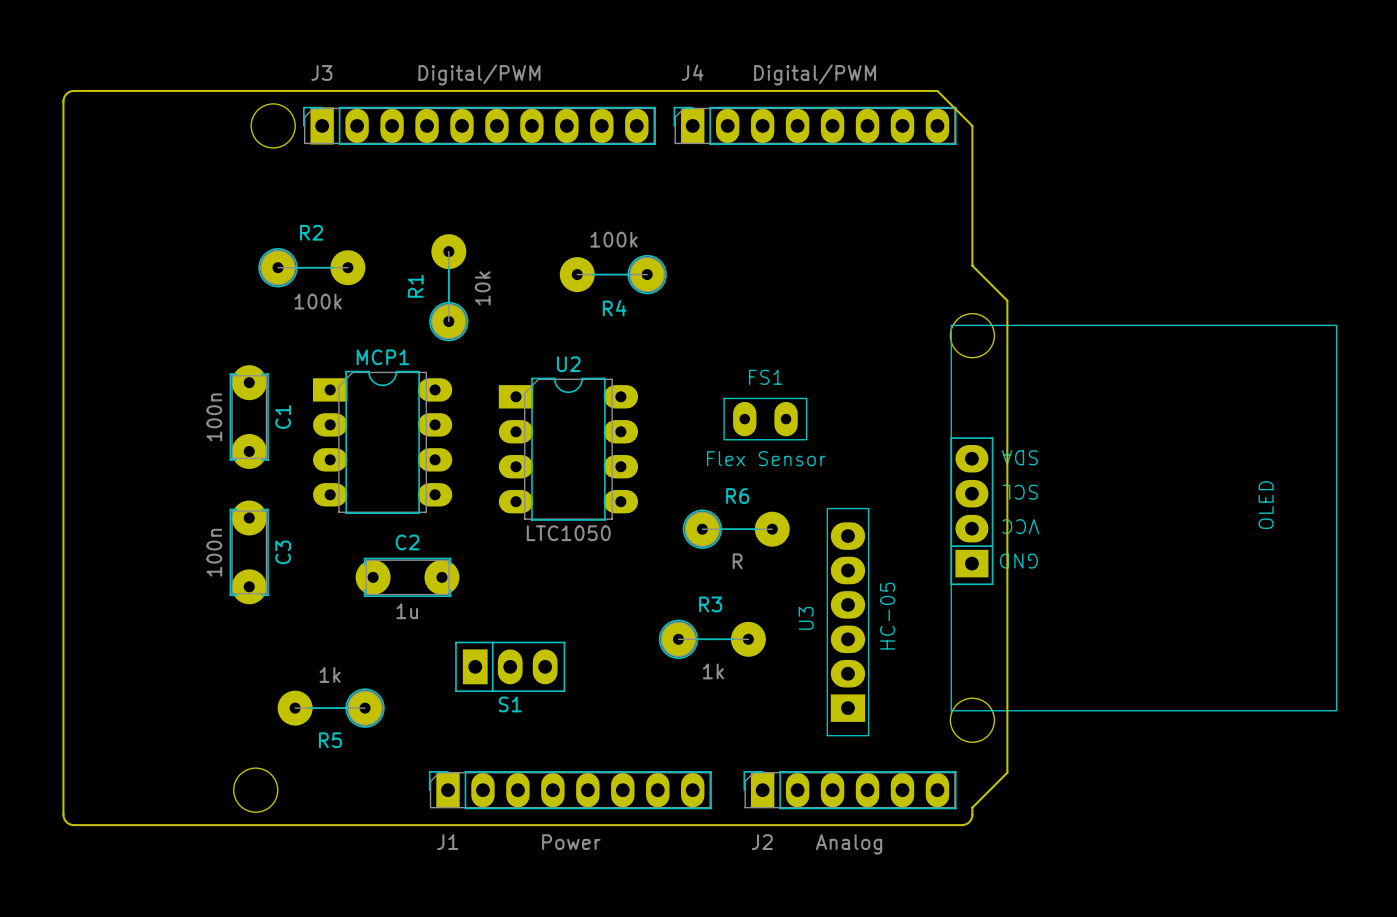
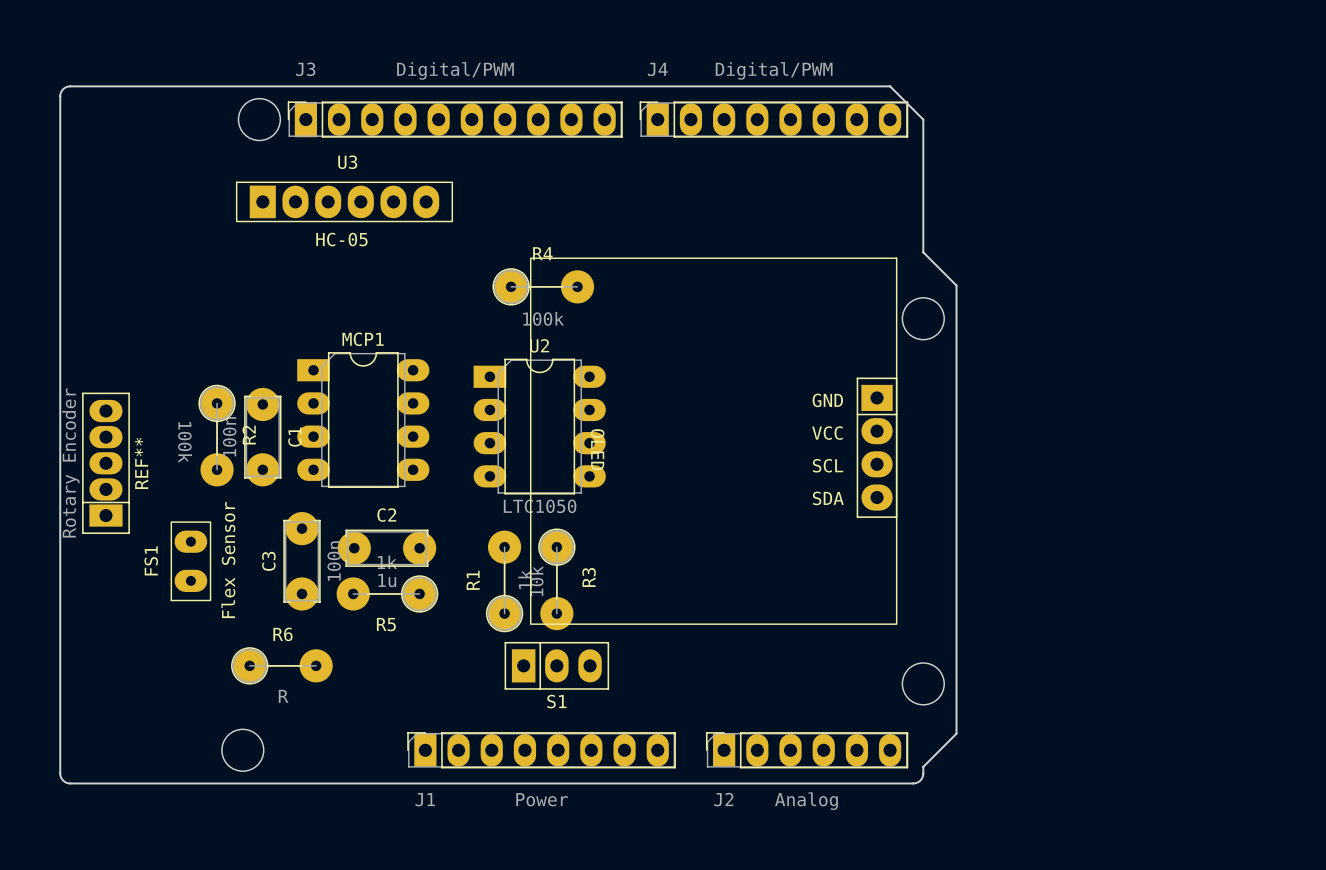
R2 rotation: 0° (311, 267) -> 90° clockwise (217, 435)
R2 position: (311, 267) -> (217, 435)
R4 rotation: 0° (613, 274) -> 180° (543, 286)
R1 position: (448, 287) -> (504, 581)
C1 position: (249, 417) -> (262, 437)
FS1 rotation: 0° (765, 419) -> 90° counterclockwise (190, 561)
FS1 position: (765, 419) -> (190, 561)
part: none -> (713, 441)
REF**: none -> Rotary Encoder (105, 463)
part: (1143, 518) -> none
R6 position: (736, 529) -> (281, 665)
C3 value position: 100n (214, 552) -> 100n (334, 561)
C3 position: (249, 552) -> (302, 561)
C3 name position: C3 (283, 552) -> C3 (268, 561)
U3 rotation: 0° (847, 622) -> 90° clockwise (344, 201)
U3 position: (847, 622) -> (344, 201)
R3 rotation: 0° (712, 639) -> 90° clockwise (556, 579)
R3 position: (712, 639) -> (556, 579)
S1 position: (510, 666) -> (556, 665)
R5 position: (331, 708) -> (387, 593)

